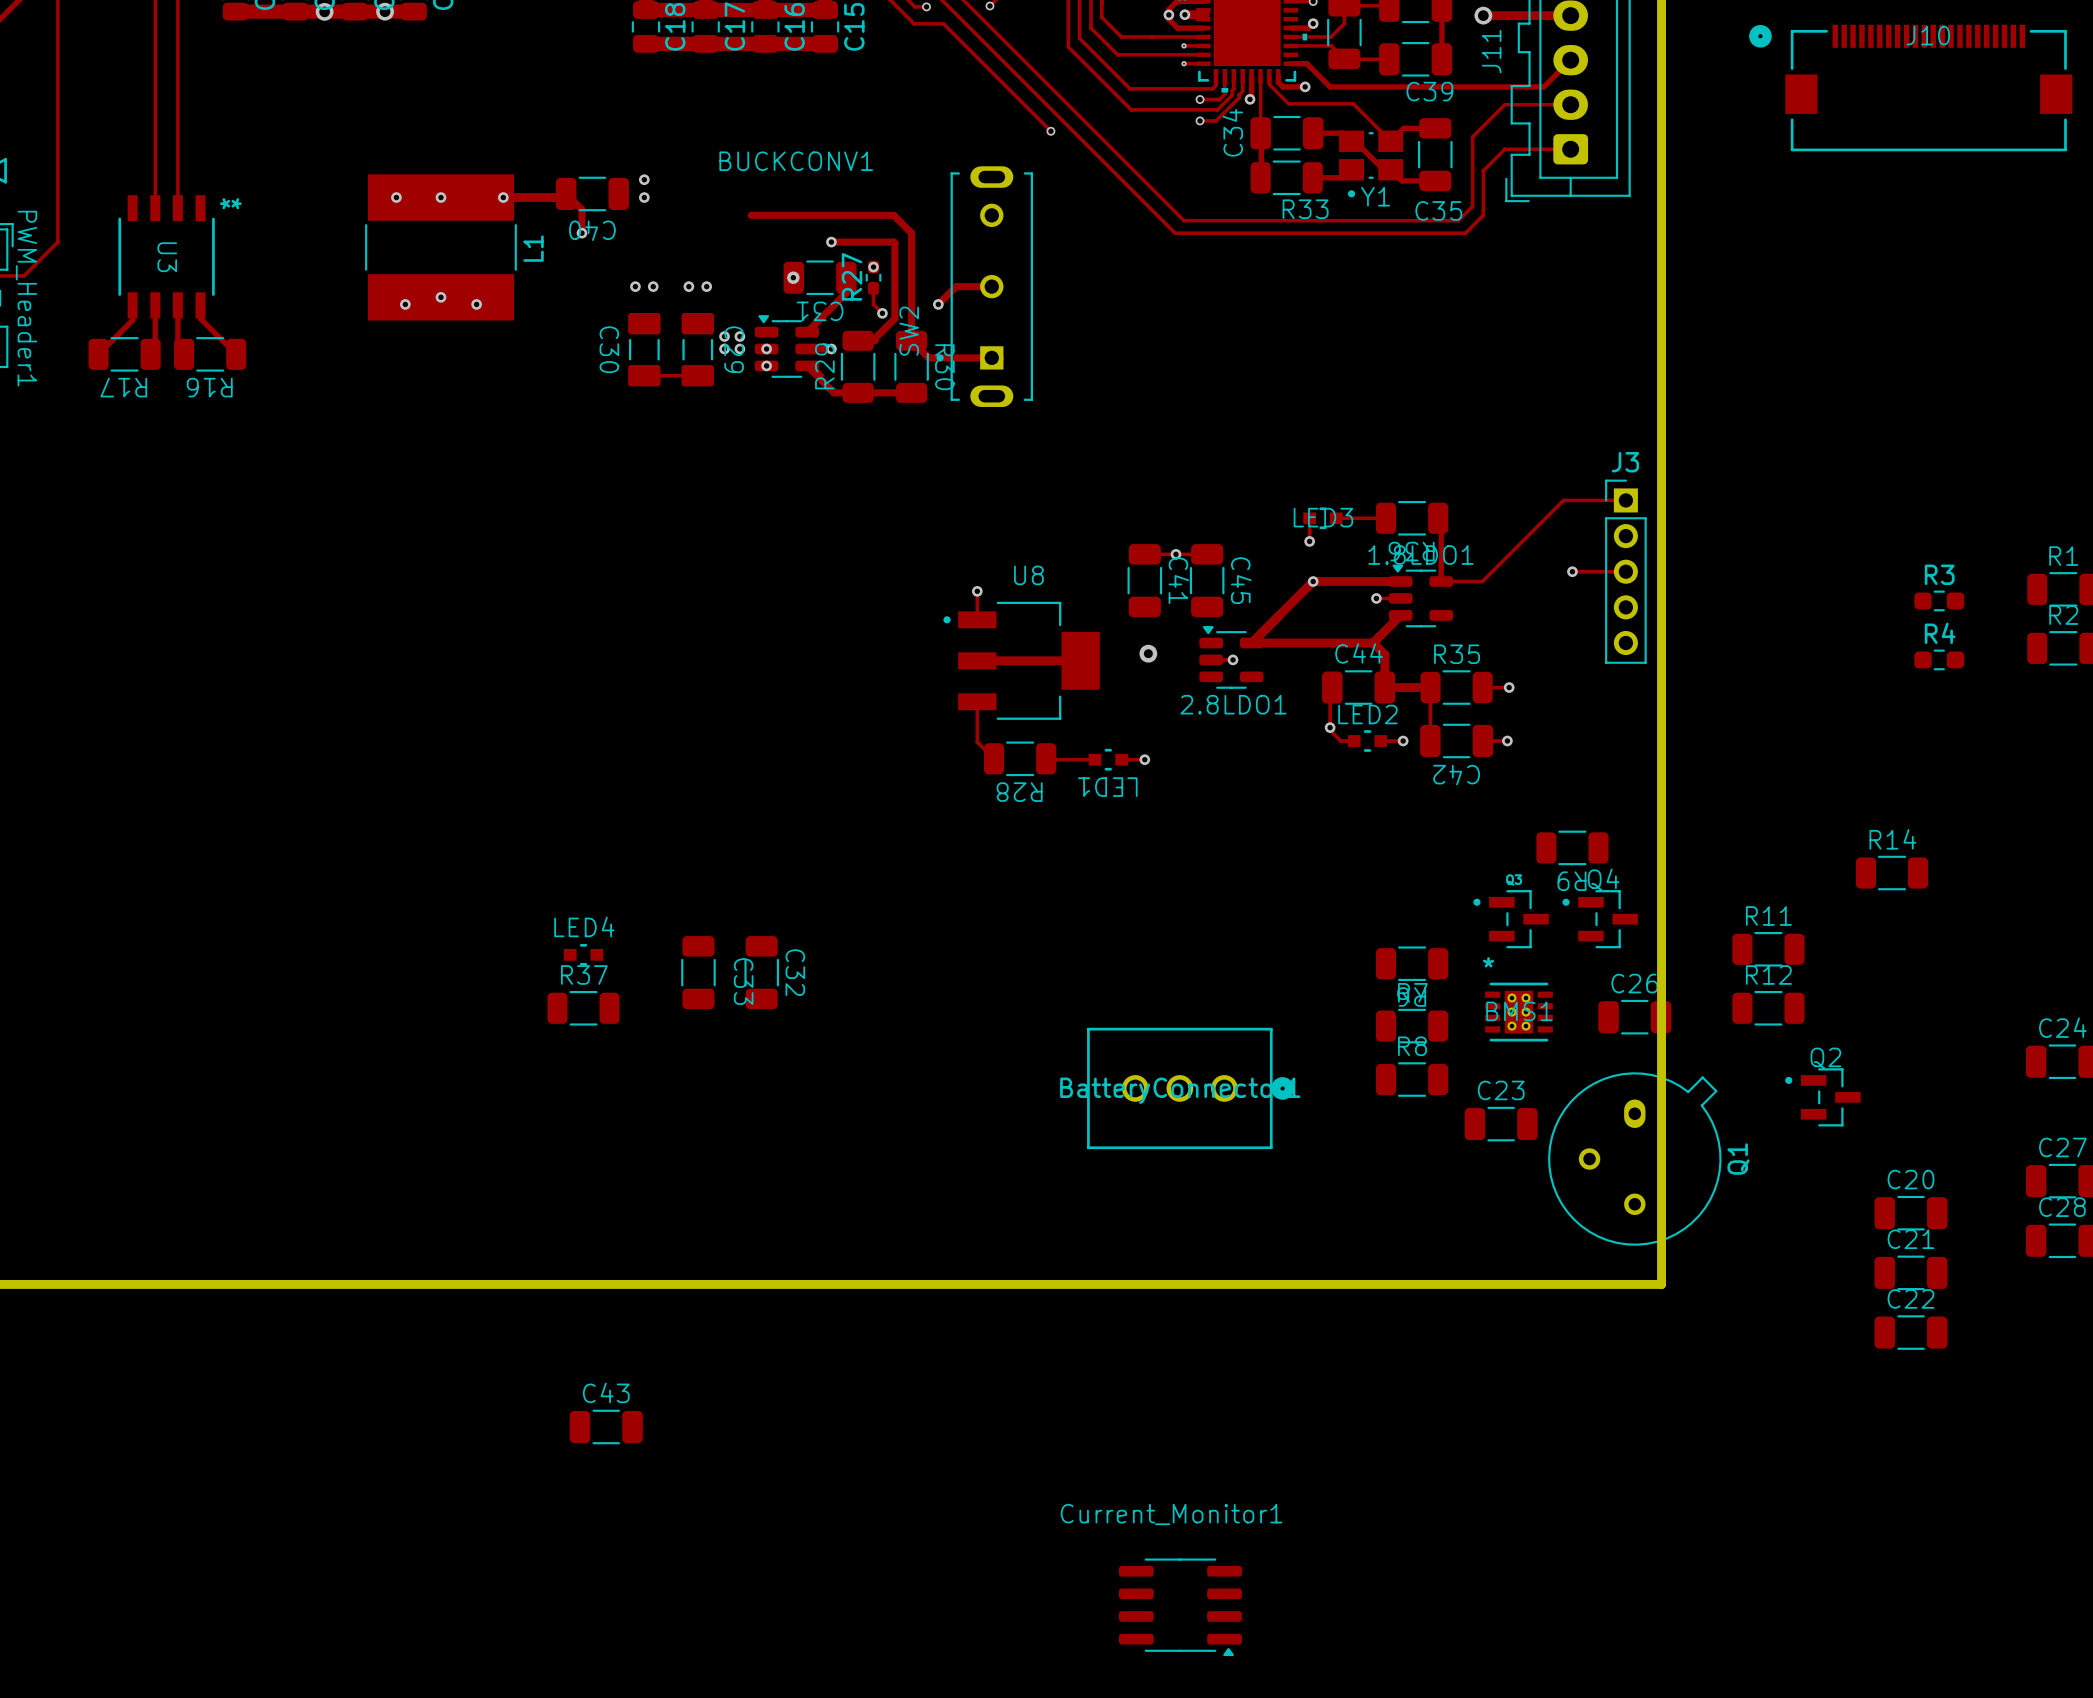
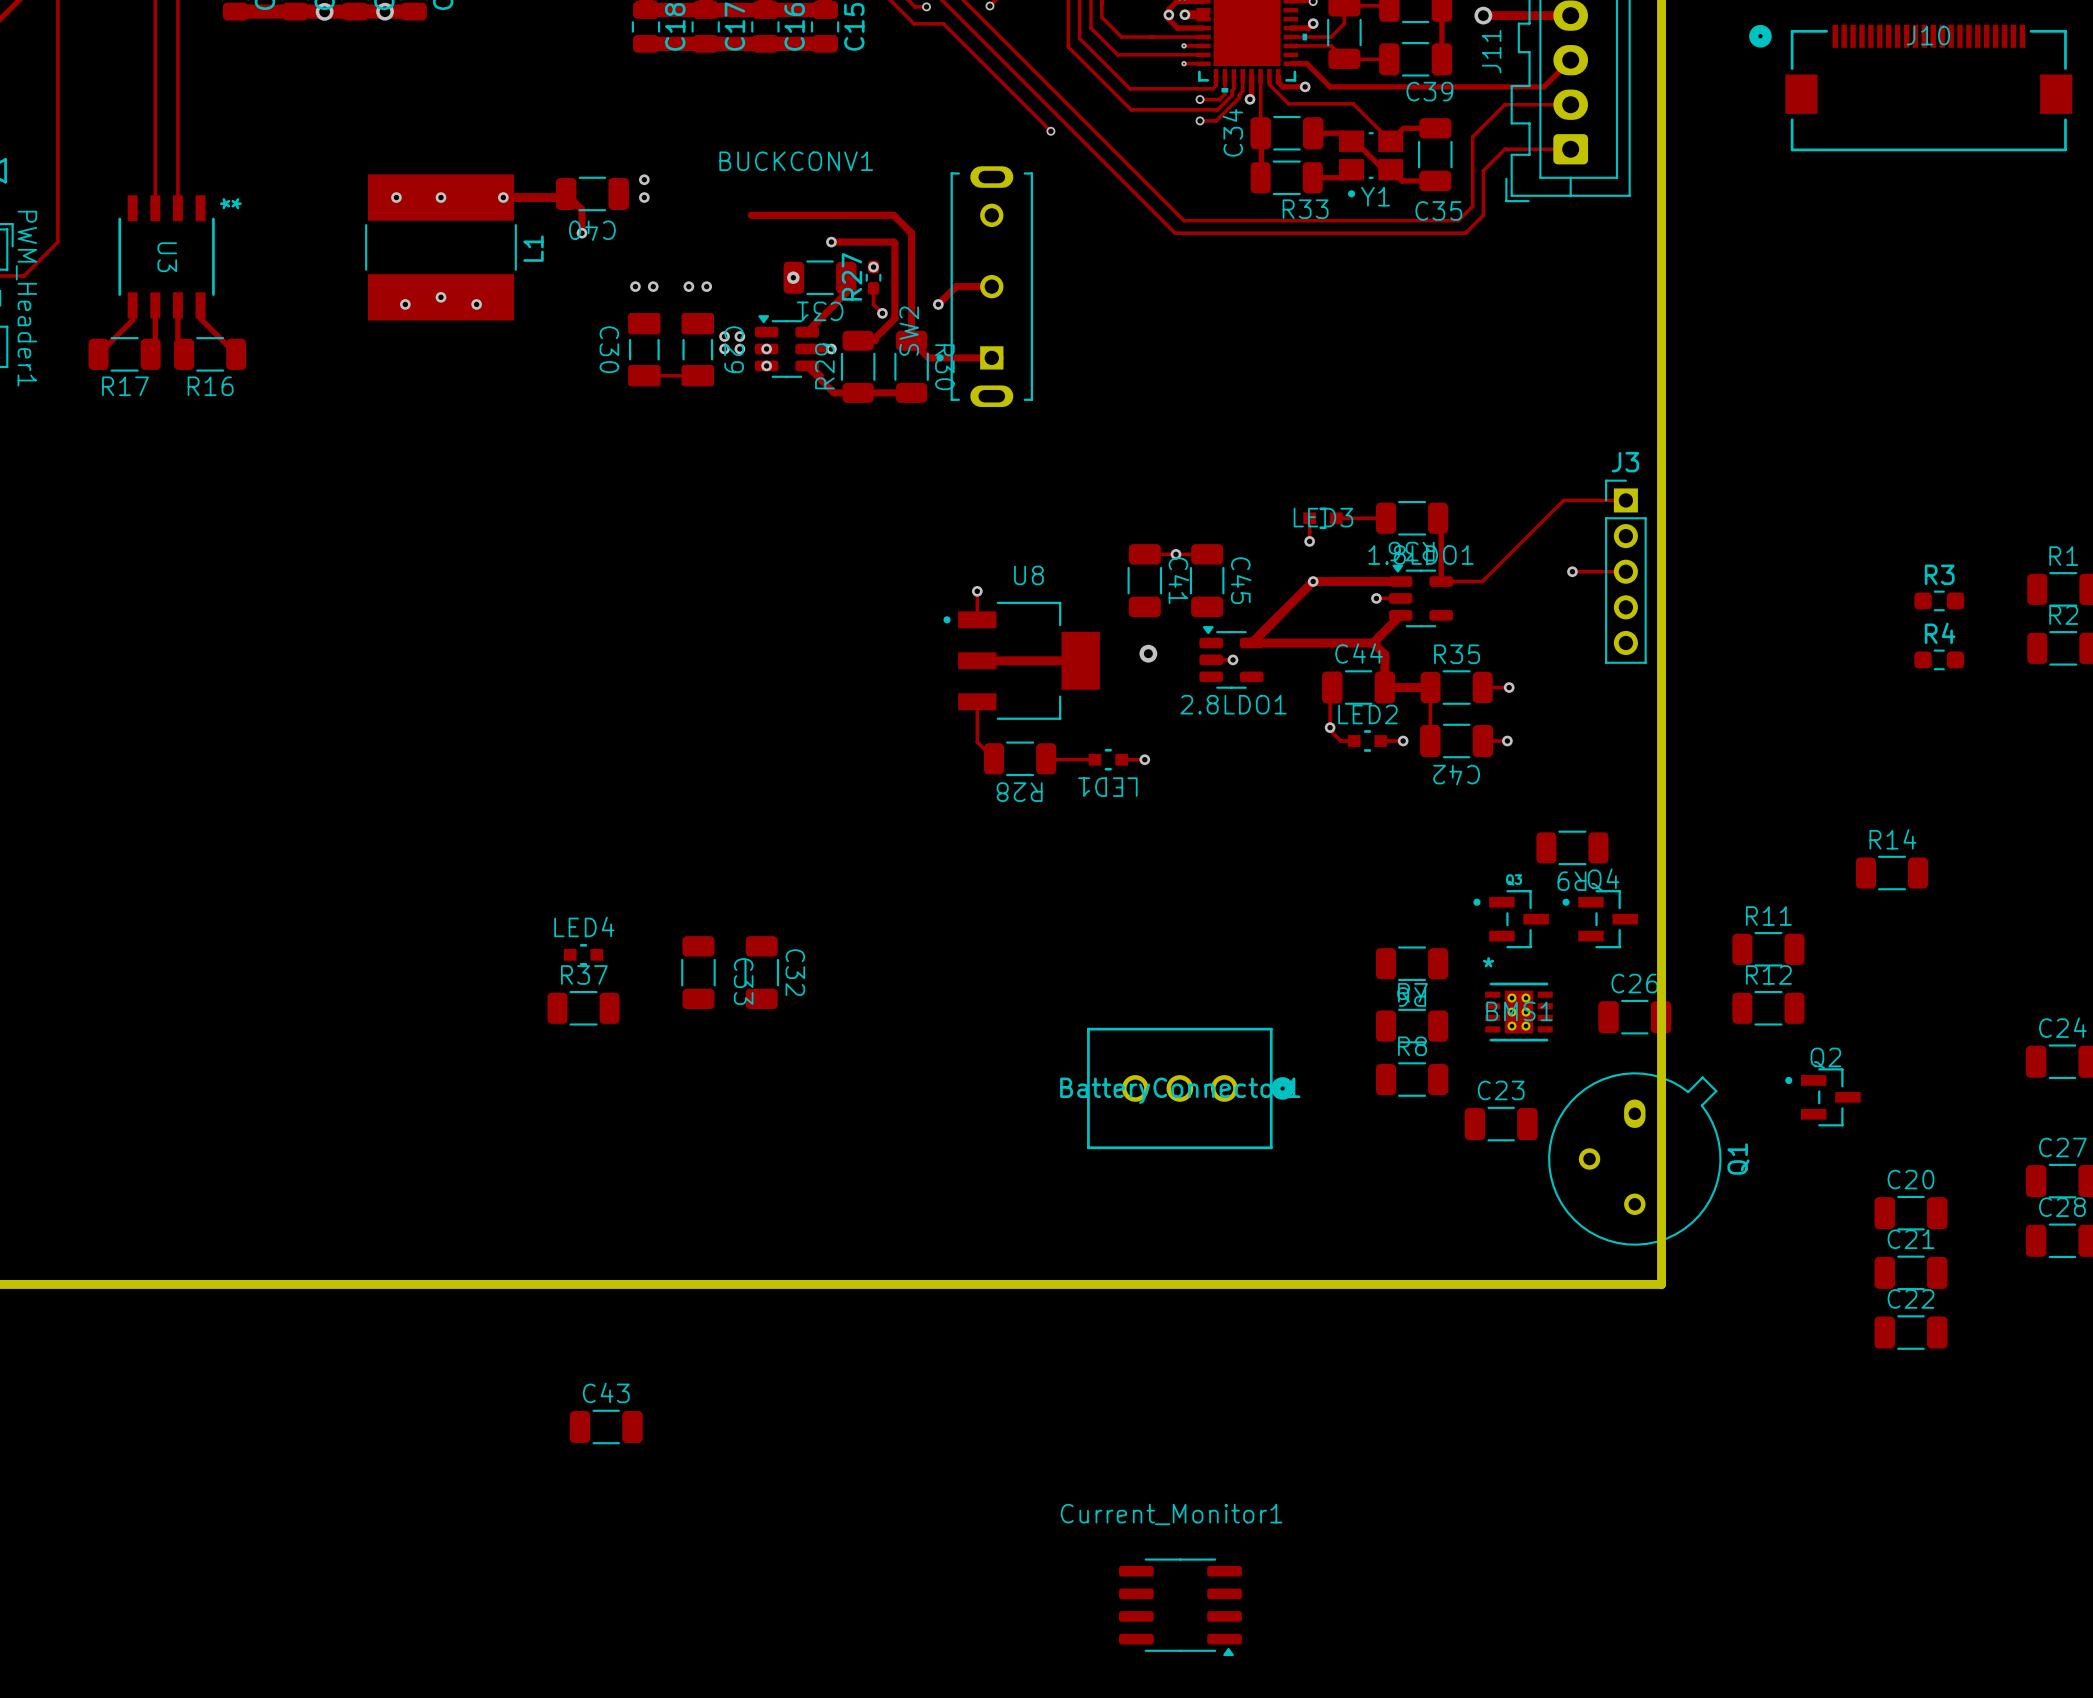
R17 name rotation: 0° (123, 387) -> 180° (125, 386)
R16 name rotation: 0° (209, 387) -> 180° (210, 386)

